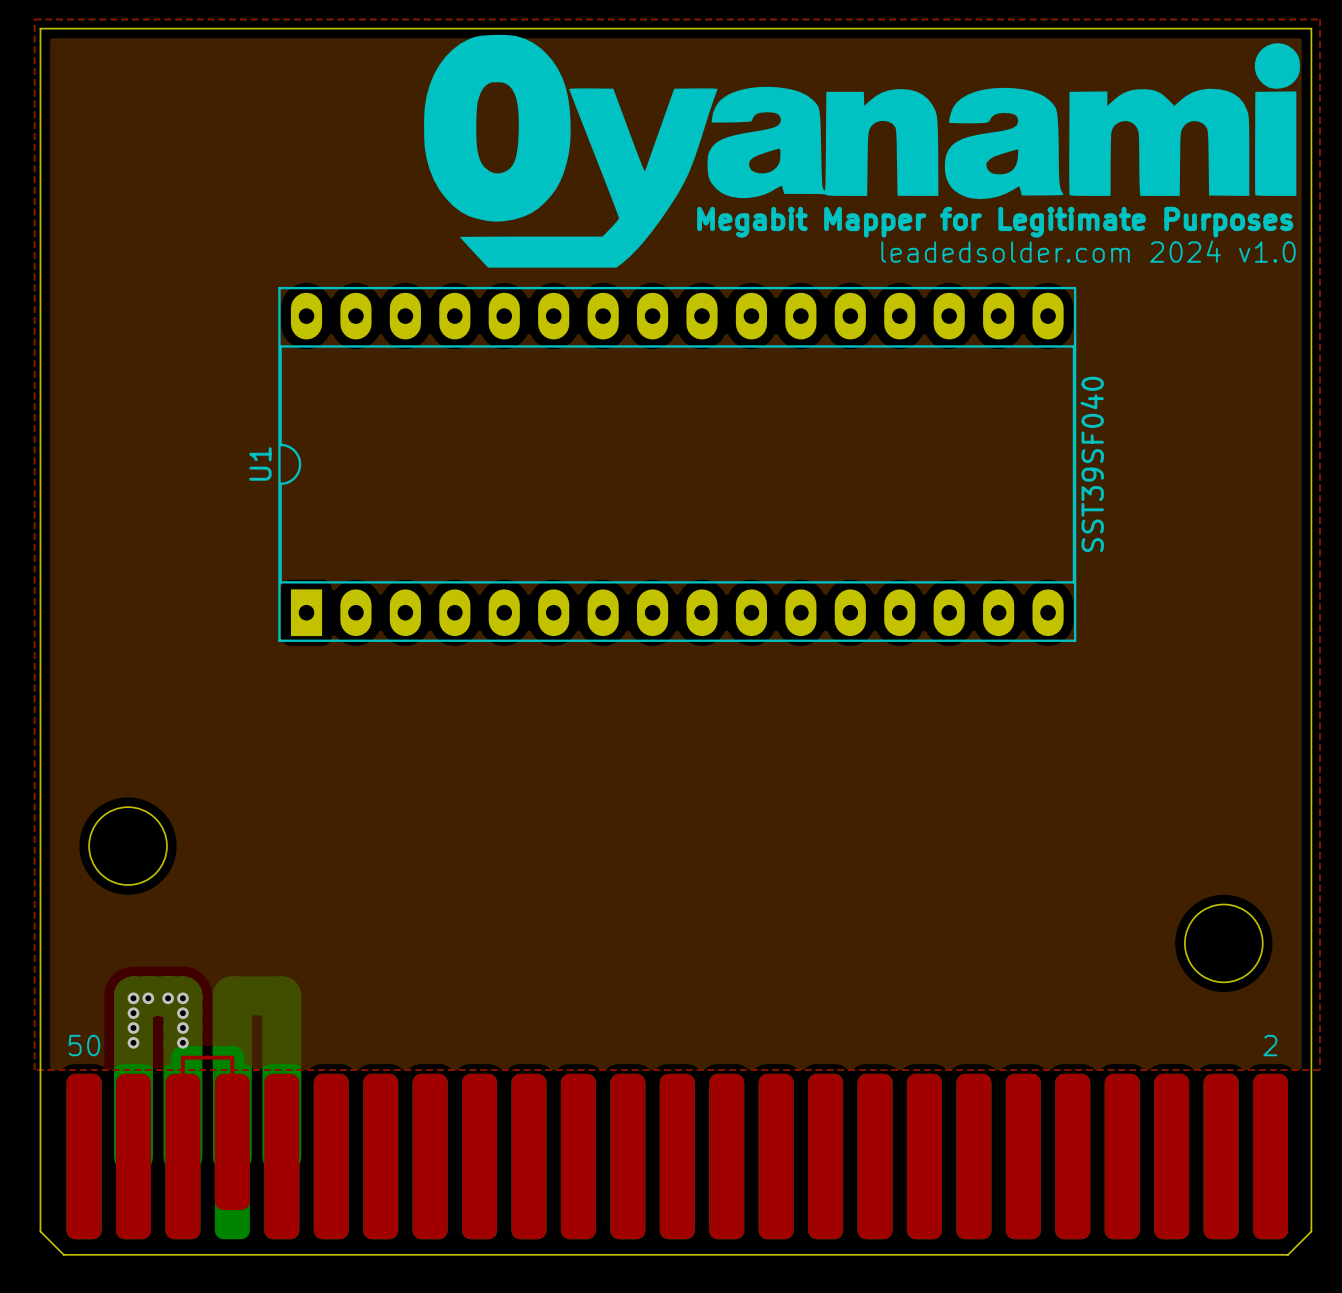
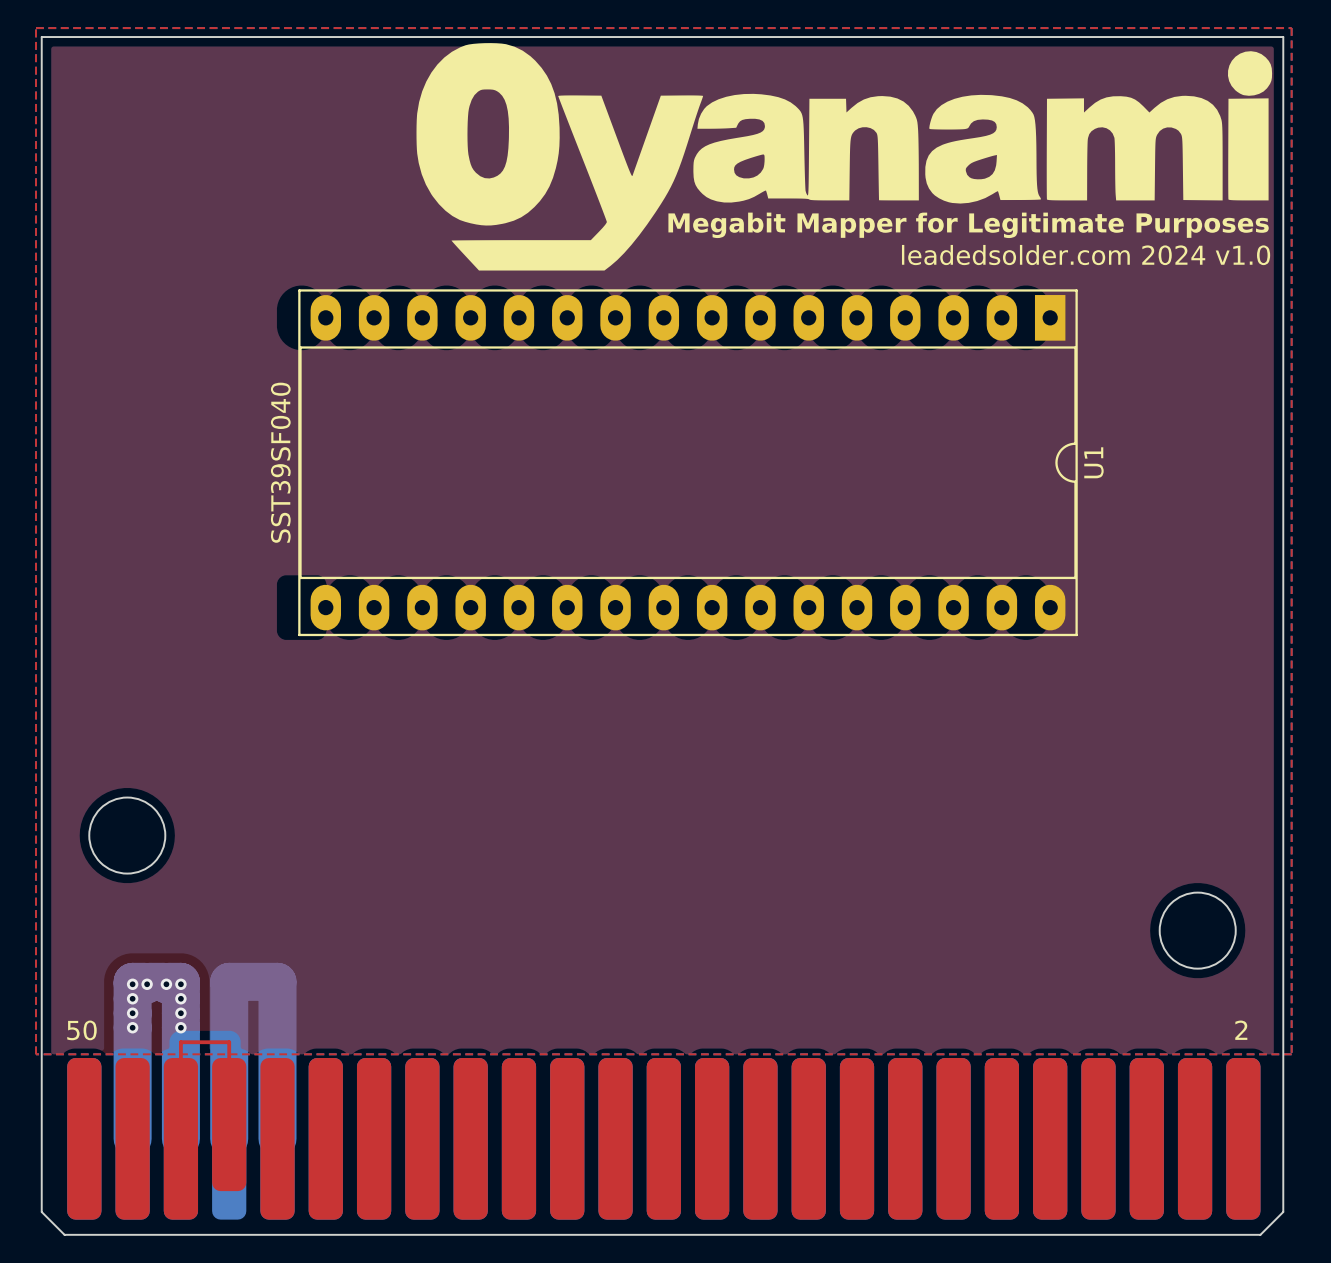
U1 rotation: 0° (677, 464) -> 180° (687, 462)

